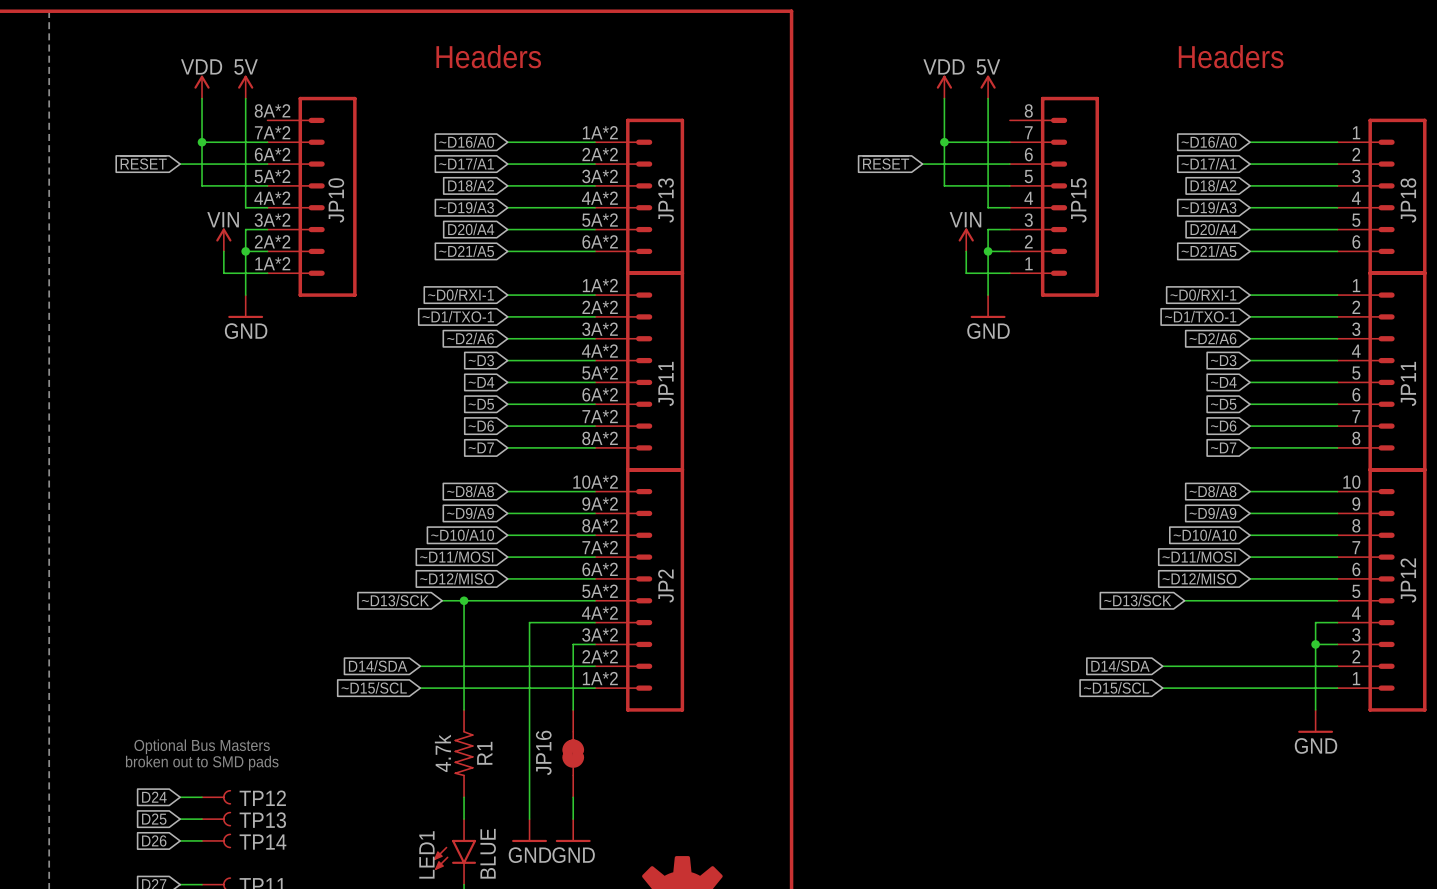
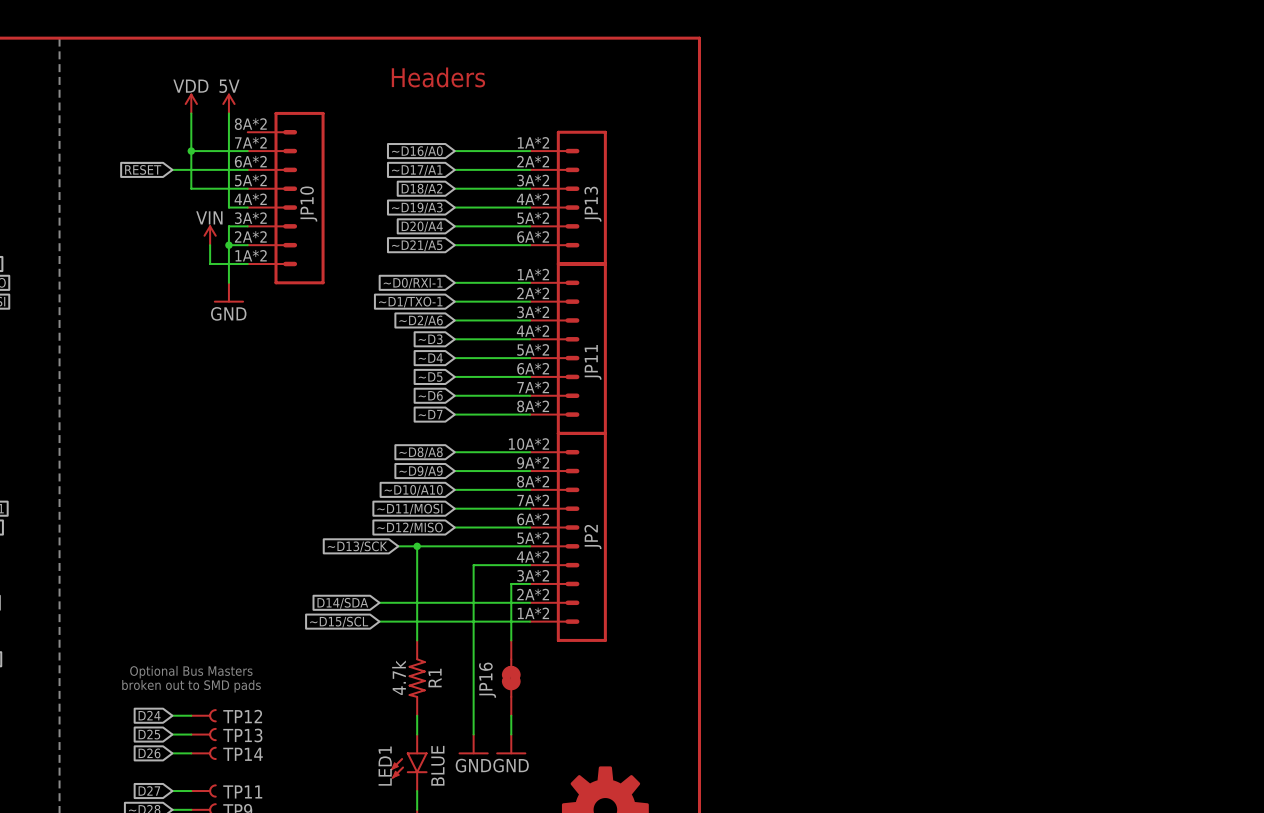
text: Headers (1231, 56) -> none
power symbol: VDD (944, 87) -> none
power symbol: 5V (988, 87) -> none
wire: (944, 98) (944, 185) (1009, 185) -> none
wire: (988, 98) (988, 207) (1009, 207) -> none
wire: (944, 142) (1009, 142) -> none
junction: (944, 142) -> none
global label: ~D16/A0 (1209, 142) -> none
wire: (1250, 142) (1337, 142) -> none
global label: ~{RESET} (885, 162) -> none
global label: ~D17/A1 (1208, 163) -> none
wire: (922, 164) (1009, 164) -> none
wire: (1250, 164) (1337, 164) -> none
global label: D18/A2 (1213, 185) -> none
wire: (1250, 185) (1337, 185) -> none
JP15: (1054, 196) -> none
JP18: (1381, 196) -> none
global label: ~D19/A3 (1209, 207) -> none
wire: (1250, 207) (1337, 207) -> none
wire: (1009, 229) (988, 229) (988, 295) -> none
global label: D20/A4 (1213, 229) -> none
wire: (1250, 229) (1337, 229) -> none
power symbol: VIN (966, 239) -> none
wire: (966, 251) (966, 273) (1009, 273) -> none
wire: (988, 251) (1009, 251) -> none
junction: (988, 251) -> none
global label: ~D21/A5 (1209, 251) -> none
wire: (1250, 251) (1337, 251) -> none
global label: ~D0/RXI-1 (1203, 294) -> none
wire: (1250, 295) (1337, 295) -> none
power symbol: GND (988, 306) -> none
global label: ~D1/TXO-1 (1200, 316) -> none
wire: (1250, 316) (1337, 316) -> none
global label: ~D2/A6 (1212, 338) -> none
wire: (1250, 338) (1337, 338) -> none
global label: ~D3 (1223, 360) -> none
wire: (1250, 360) (1337, 360) -> none
part: JP11 (1381, 371) -> none
global label: ~D4 (1223, 382) -> none
wire: (1250, 382) (1337, 382) -> none
global label: ~D5 (1223, 404) -> none
wire: (1250, 404) (1337, 404) -> none
global label: ~D6 (1223, 426) -> none
wire: (1250, 426) (1337, 426) -> none
global label: ~D7 (1223, 447) -> none
wire: (1250, 447) (1337, 447) -> none
global label: ~D8/A8 (1212, 491) -> none
wire: (1250, 491) (1337, 491) -> none
global label: ~D9/A9 (1212, 513) -> none
wire: (1250, 513) (1337, 513) -> none
global label: ~D10/A10 (1205, 535) -> none
wire: (1250, 535) (1337, 535) -> none
global label: ~D11/MOSI (1199, 556) -> none
wire: (1250, 557) (1337, 557) -> none
global label: ~D12/MISO (1199, 578) -> none
wire: (1250, 578) (1337, 578) -> none
JP12: (1381, 589) -> none
global label: ~D13/SCK (1137, 600) -> none
wire: (1184, 600) (1337, 600) -> none
wire: (1337, 622) (1315, 622) (1315, 709) -> none
wire: (1315, 644) (1337, 644) -> none
junction: (1315, 644) -> none
global label: D14/SDA (1120, 666) -> none
wire: (1162, 666) (1337, 666) -> none
global label: ~D15/SCL (1116, 687) -> none
wire: (1162, 688) (1337, 688) -> none
power symbol: GND (1315, 721) -> none

